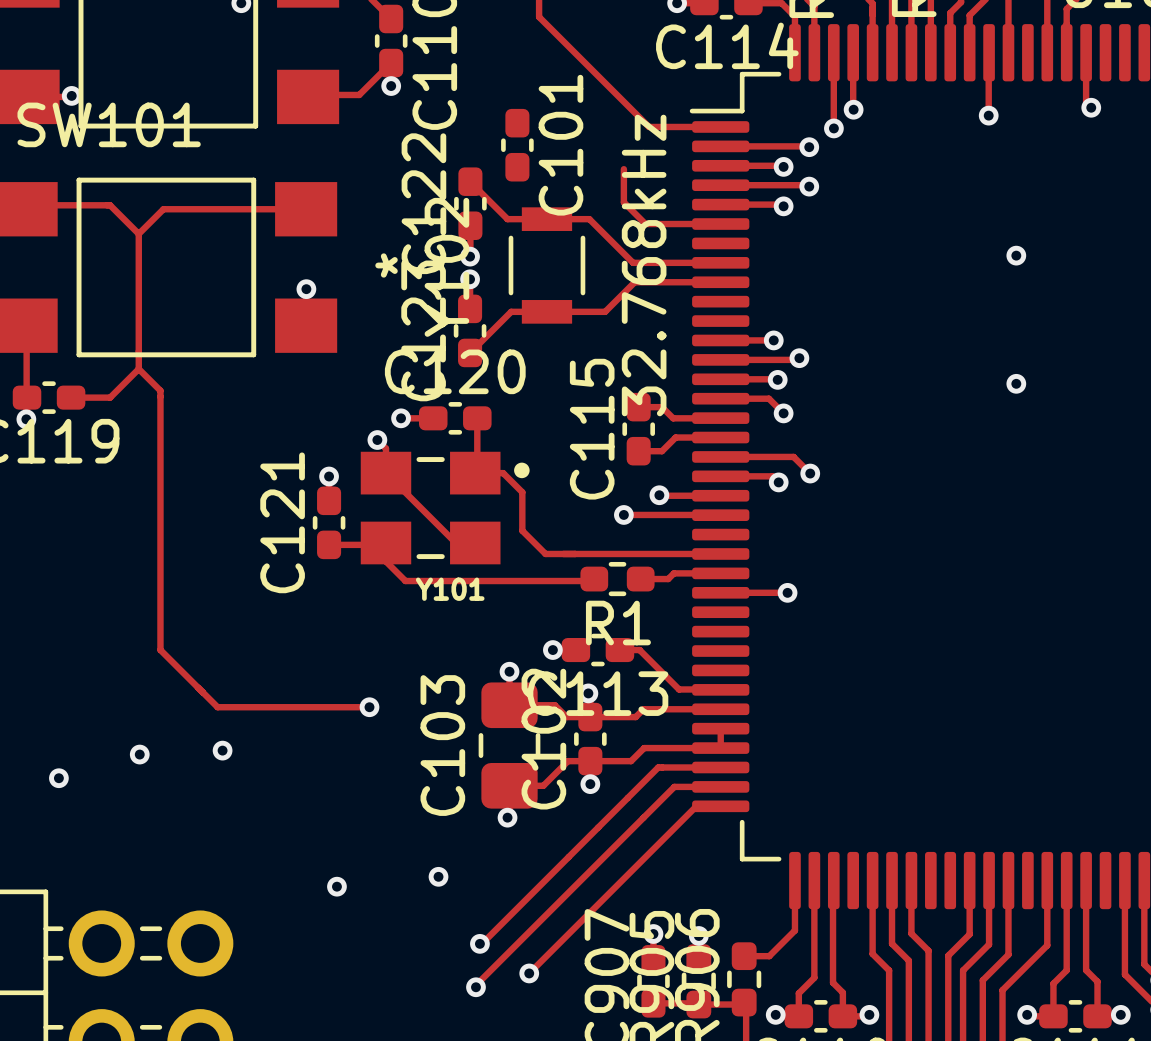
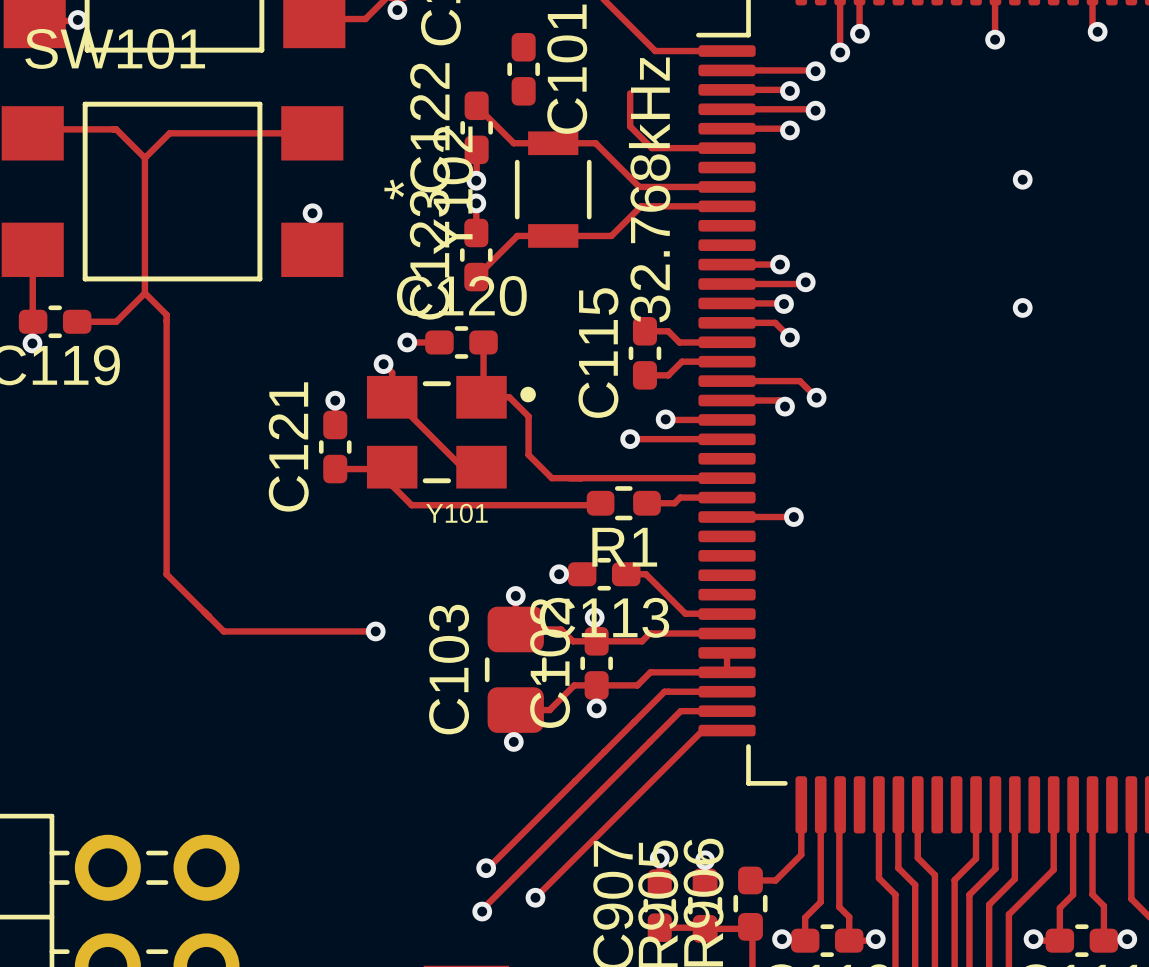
via: (222, 750) -> none
via: (139, 754) -> none
via: (58, 778) -> none
via: (438, 876) -> none
via: (336, 886) -> none

